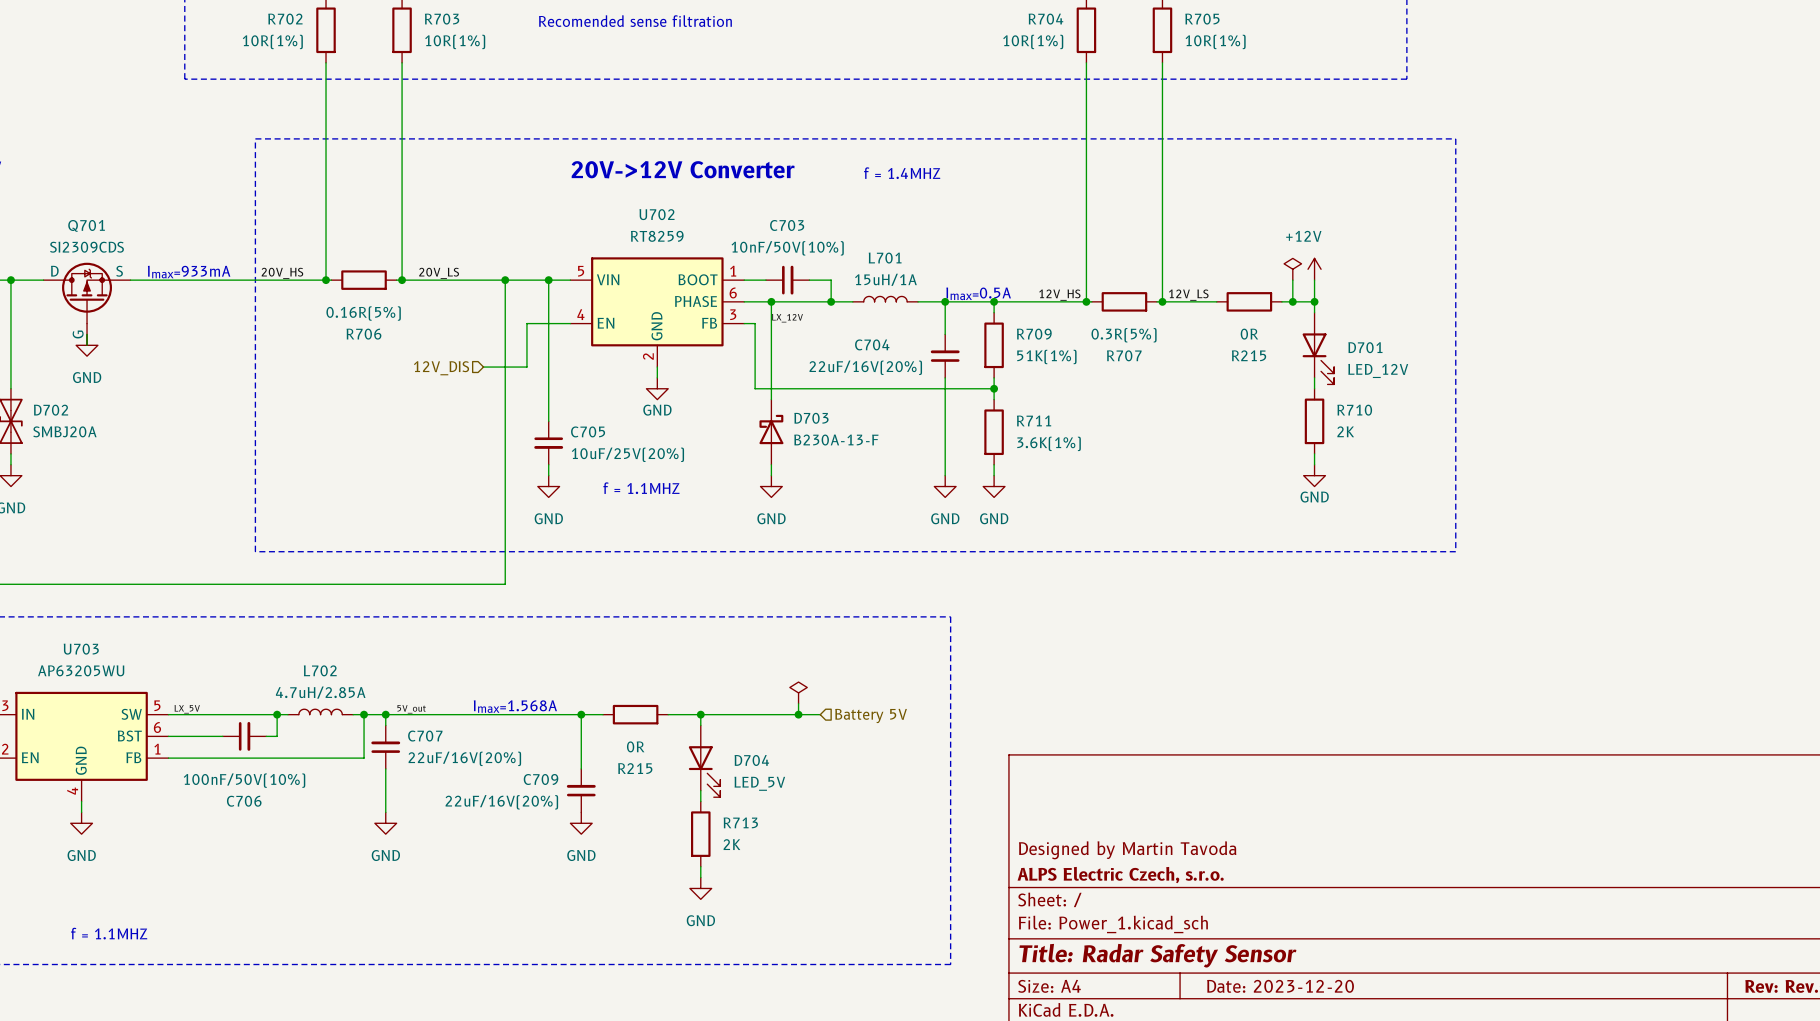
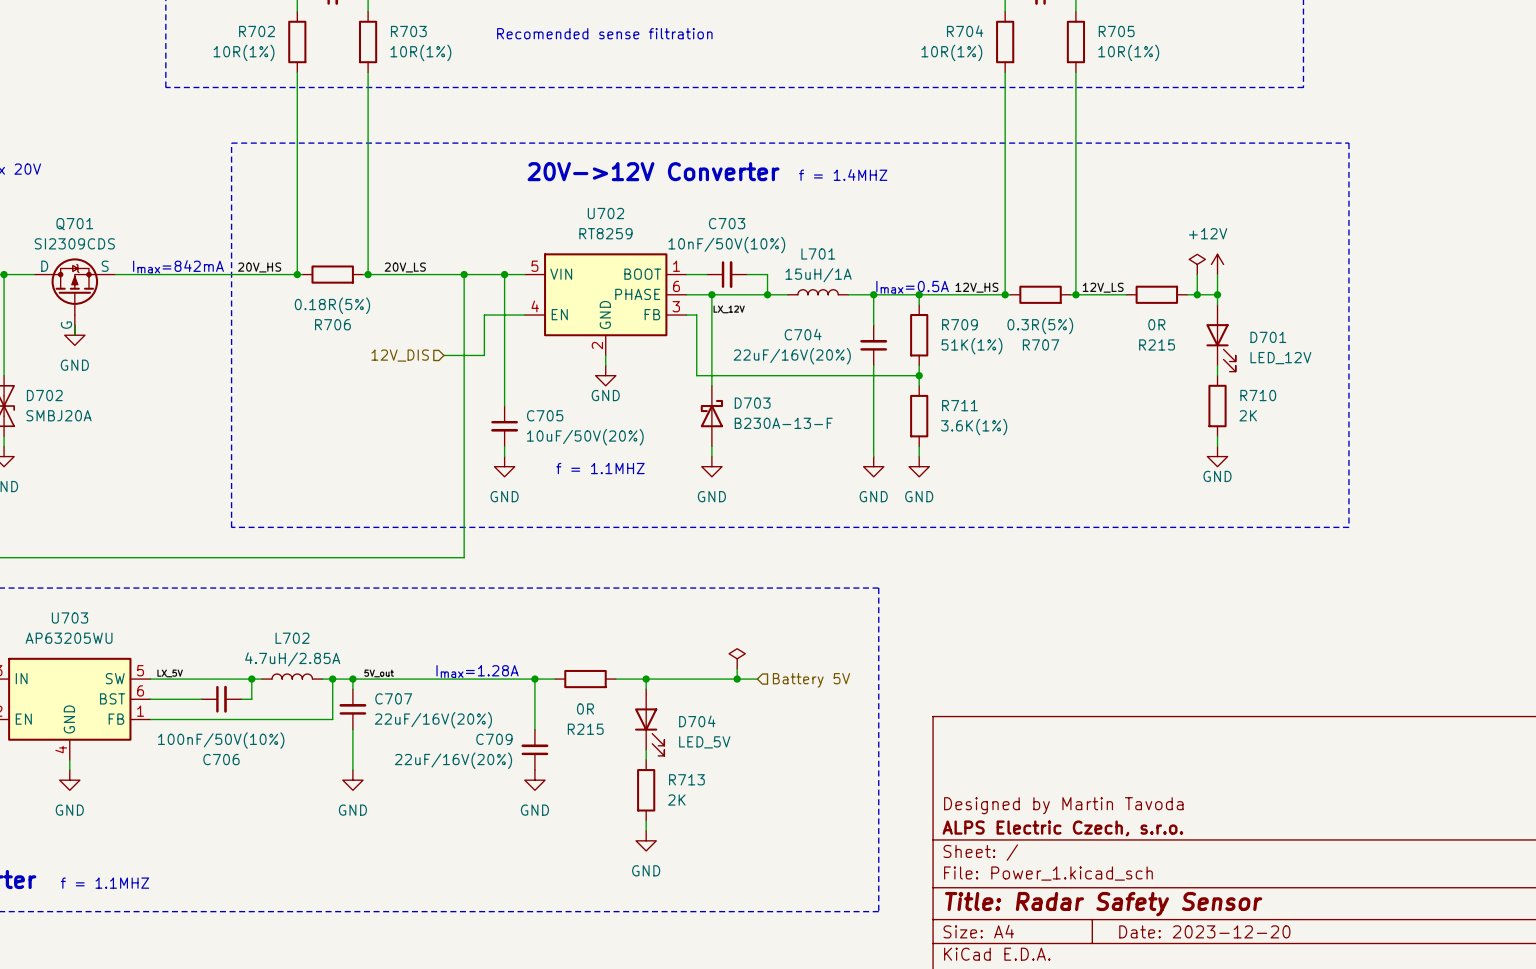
text: Imax=933mA (189, 272) -> Imax=842mA (178, 266)
R706 value: 0.16R(5%) (363, 313) -> 0.18R(5%) (332, 305)
C705 value: 10uF/25V(20%) (627, 454) -> 10uF/50V(20%) (585, 437)
text: Imax=1.568A (515, 706) -> Imax=1.28A (477, 671)

